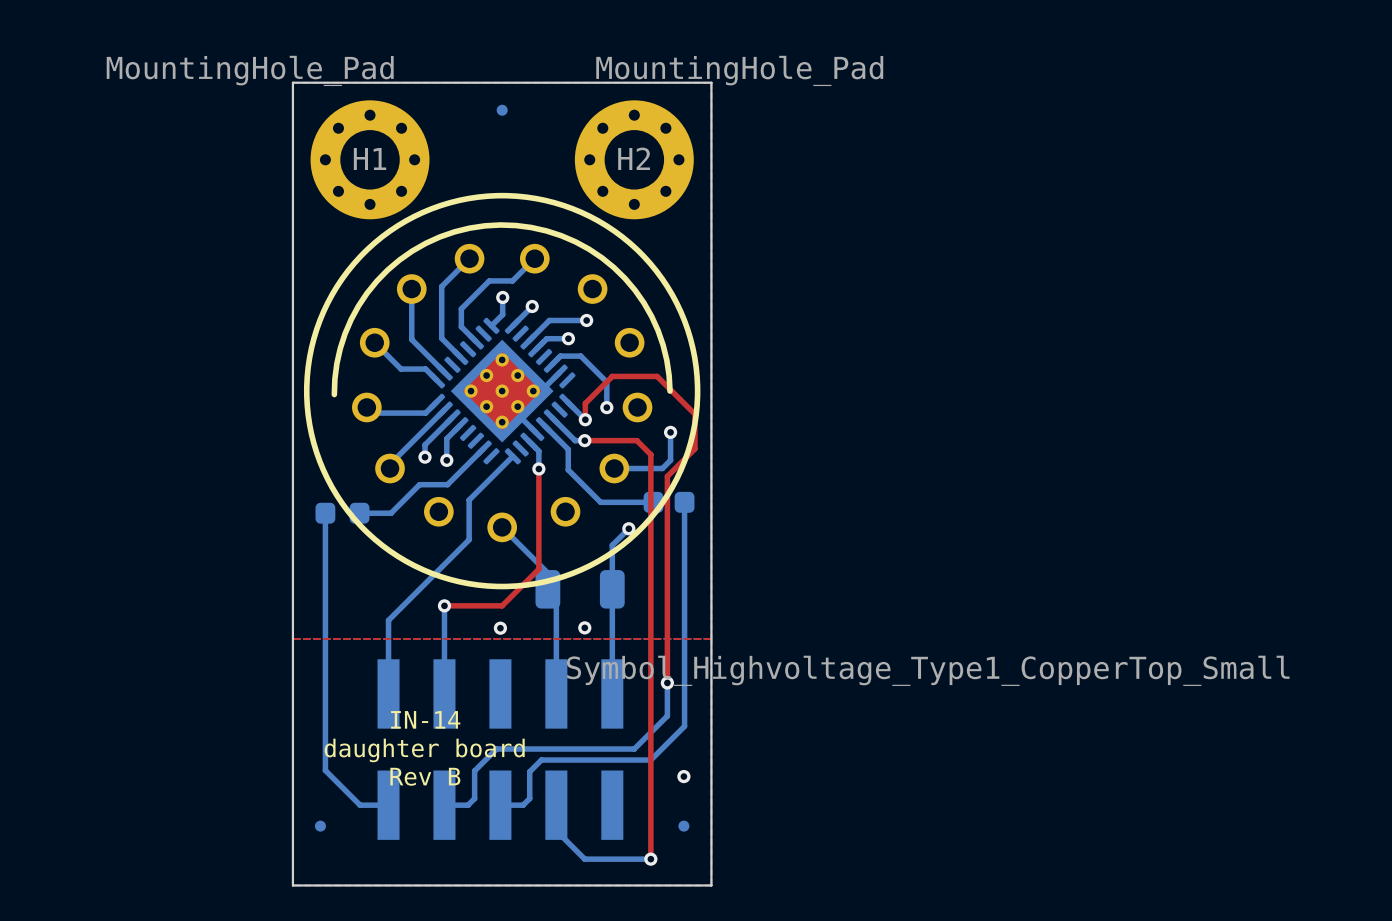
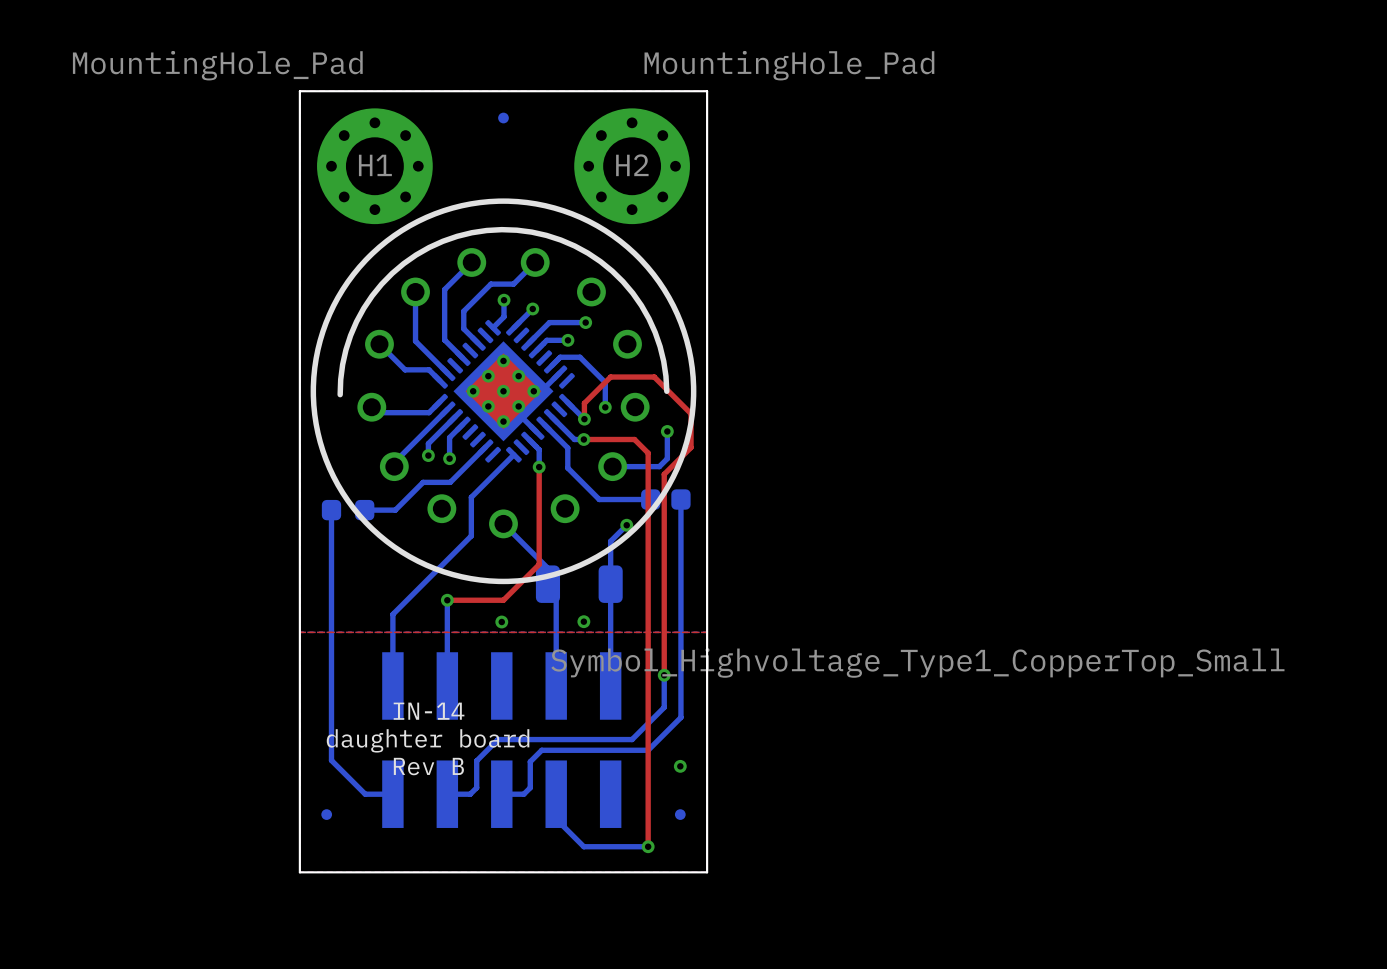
H1 value position: MountingHole_Pad (250, 70) -> MountingHole_Pad (217, 65)
H2 value position: MountingHole_Pad (739, 70) -> MountingHole_Pad (789, 65)

